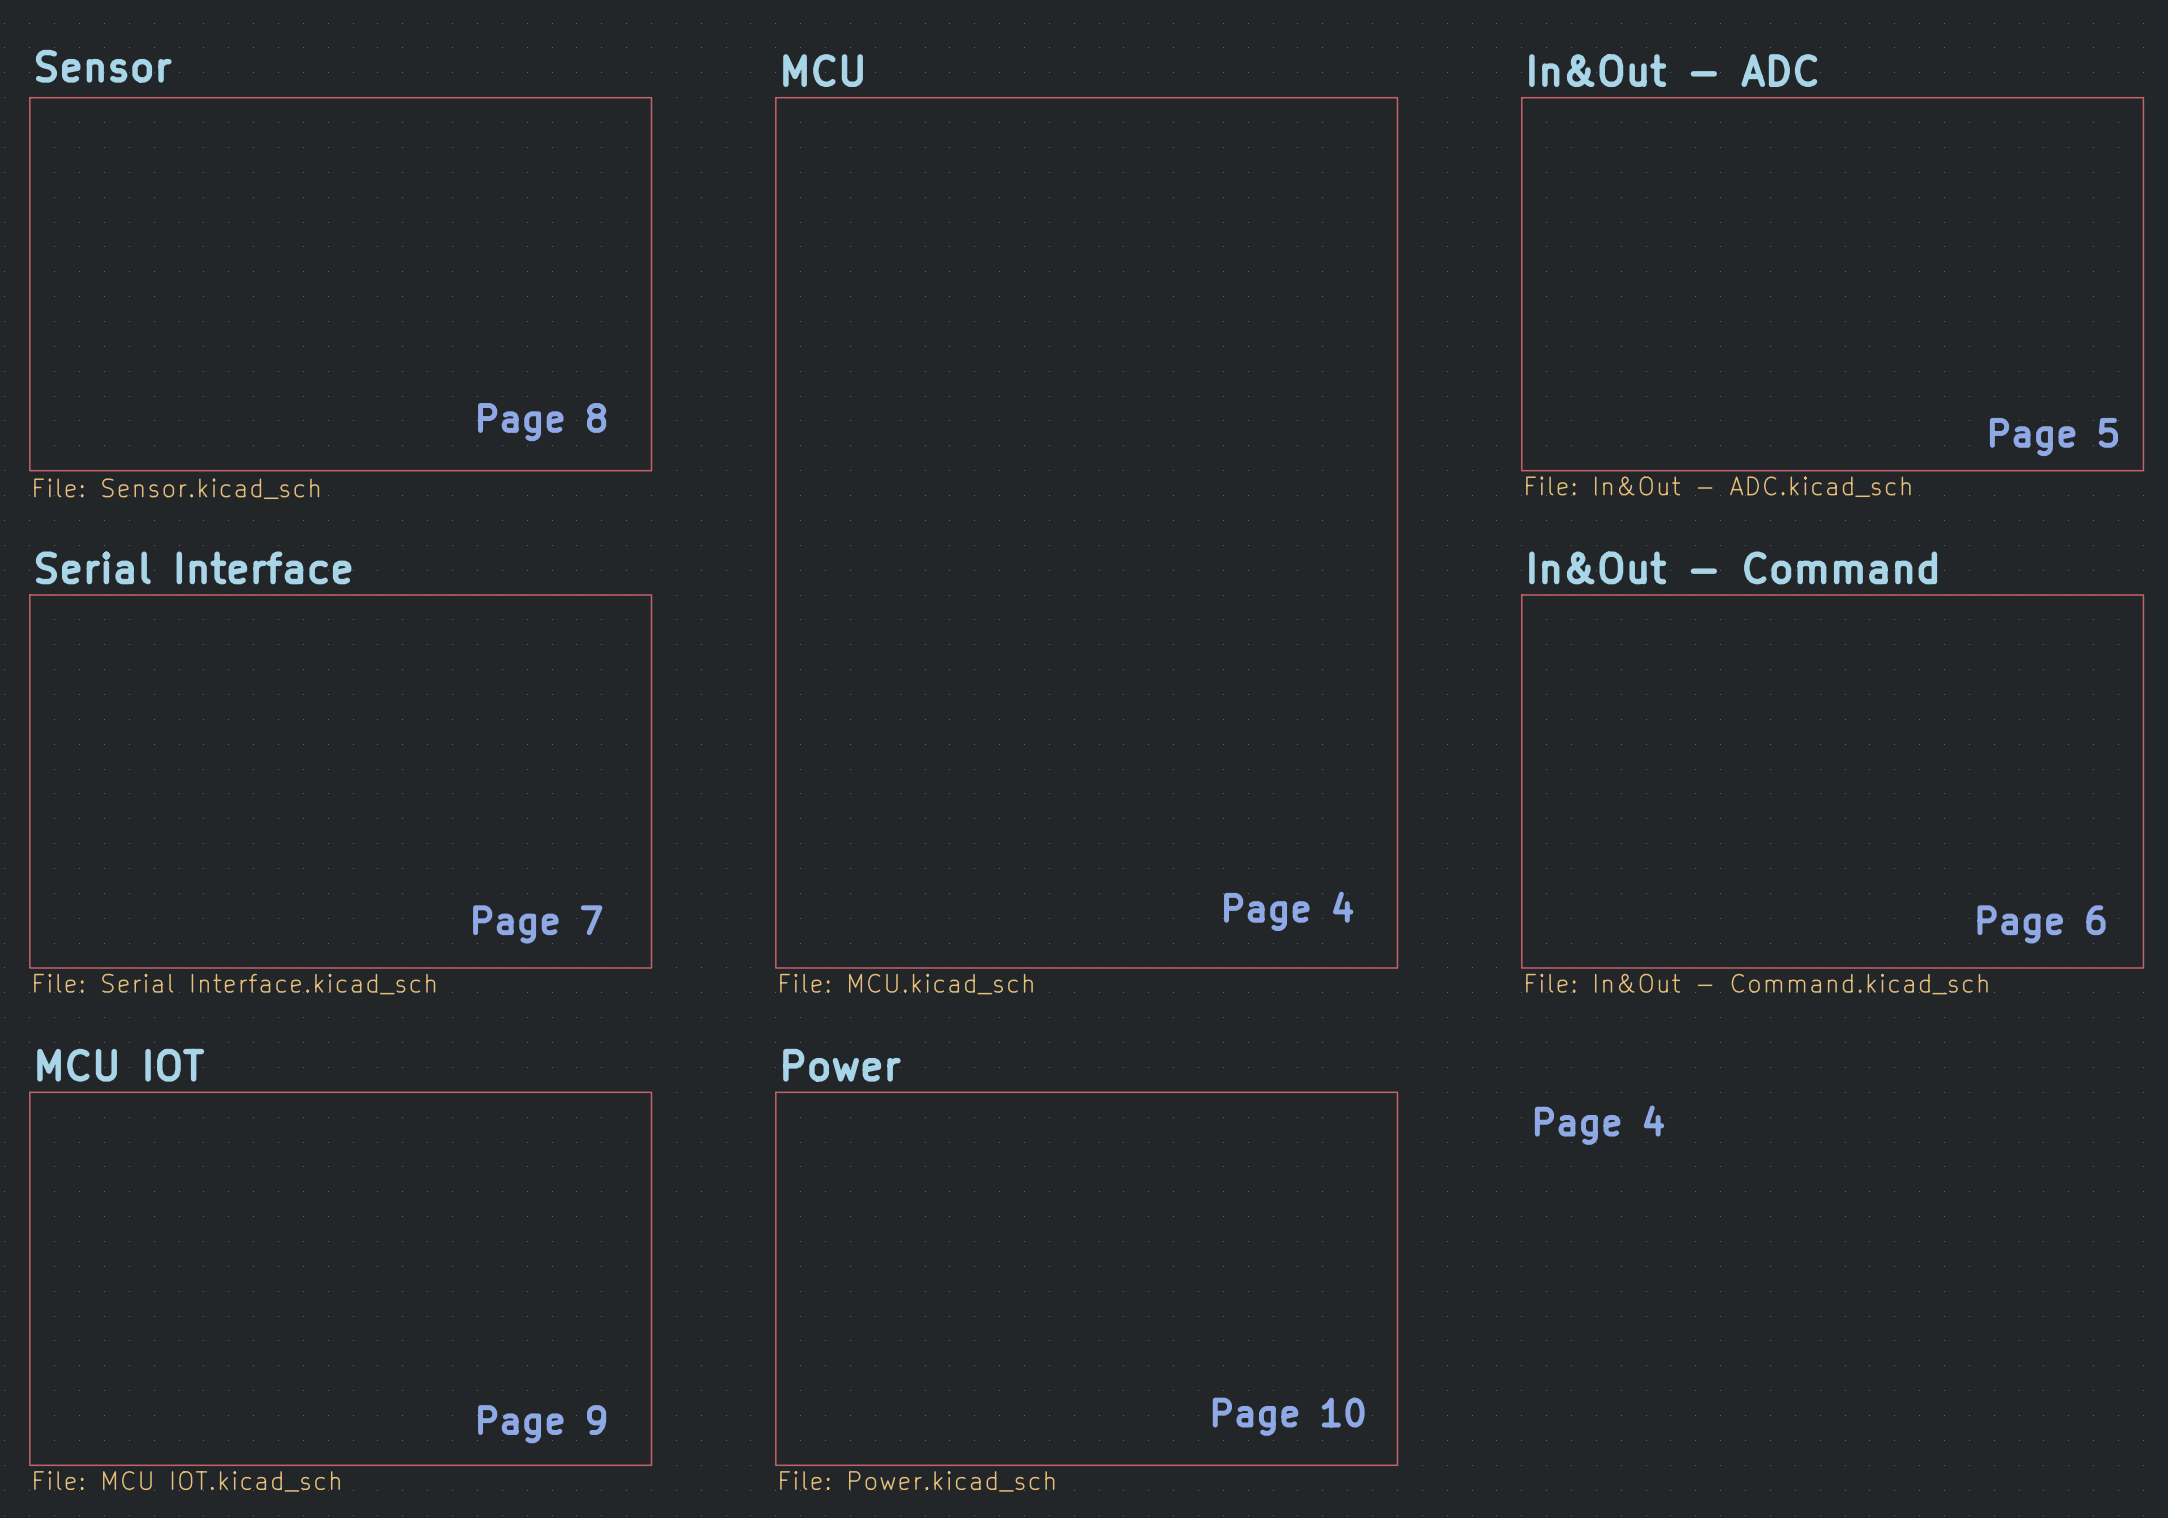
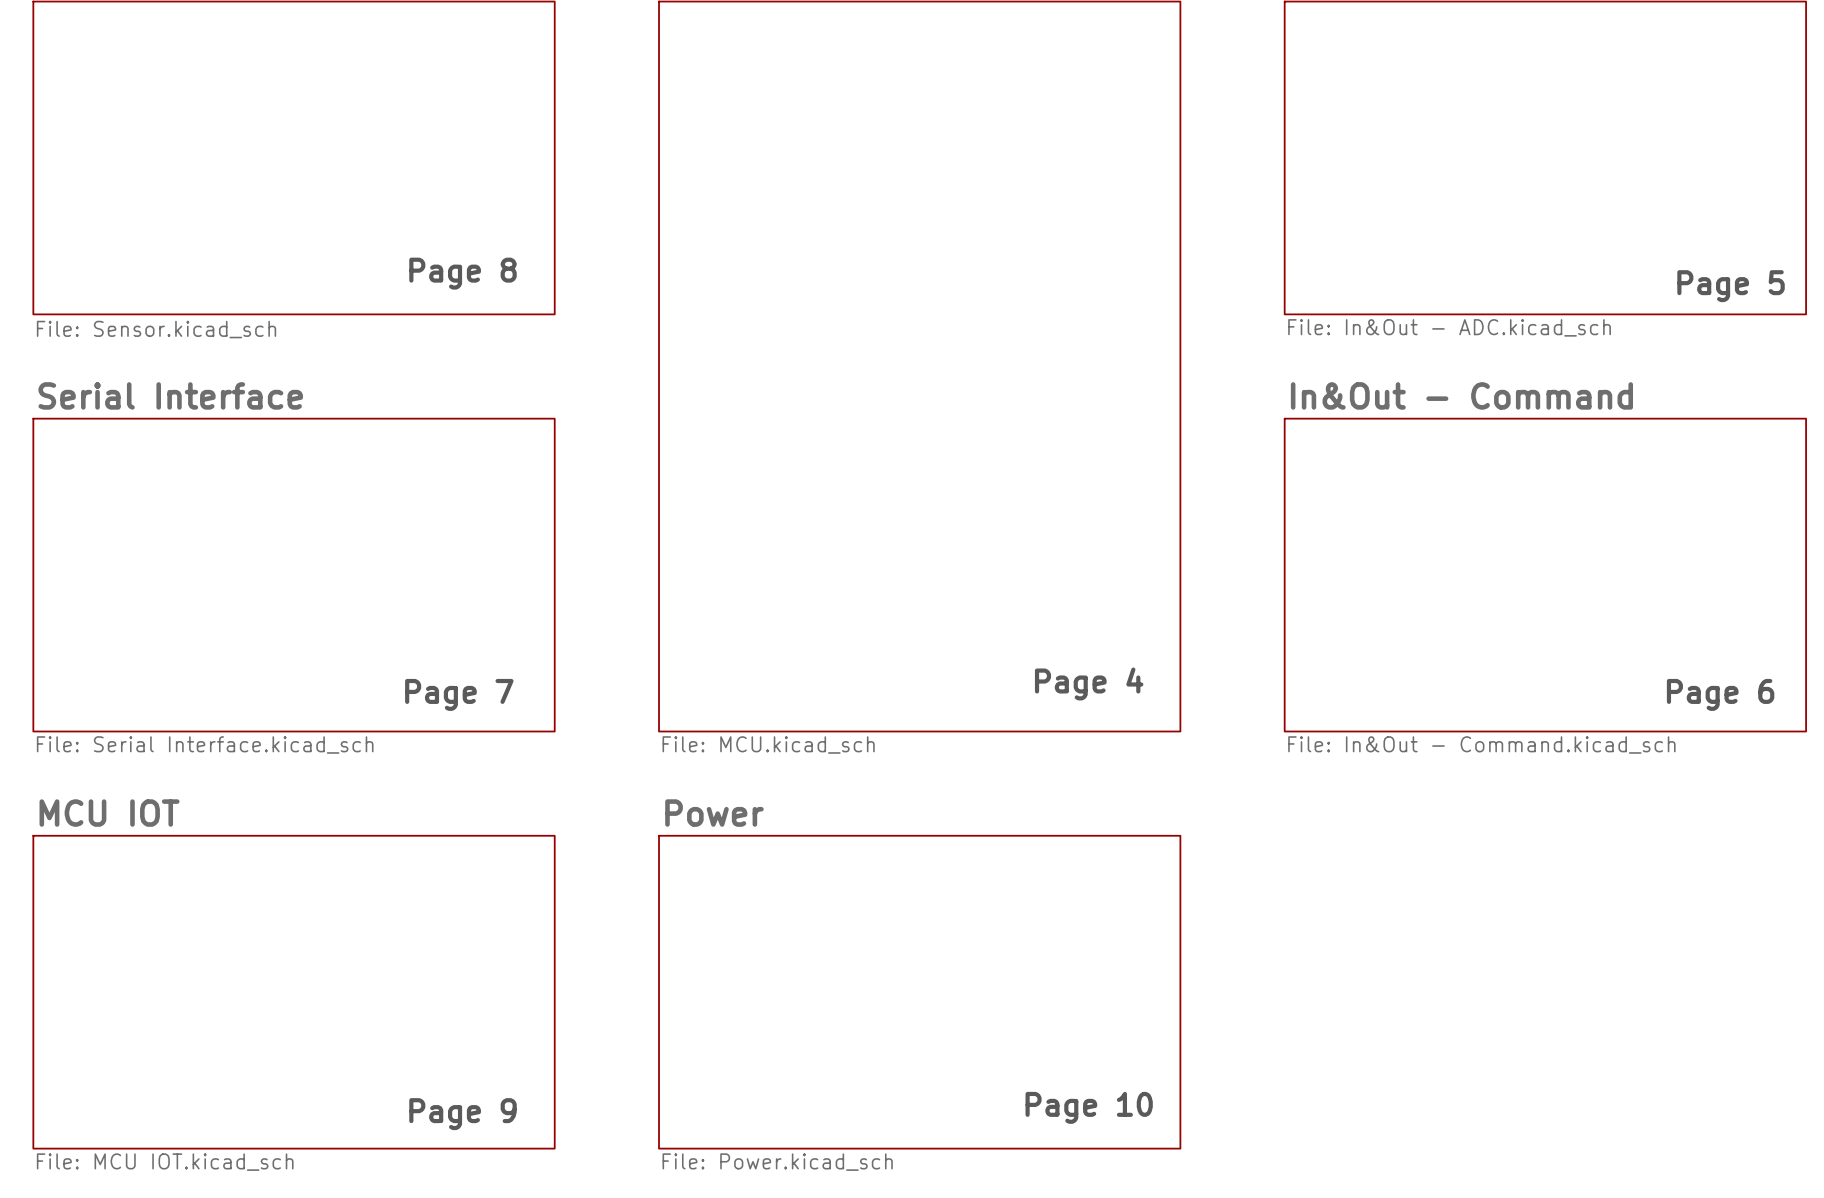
text: Page 4 (1599, 1125) -> none

